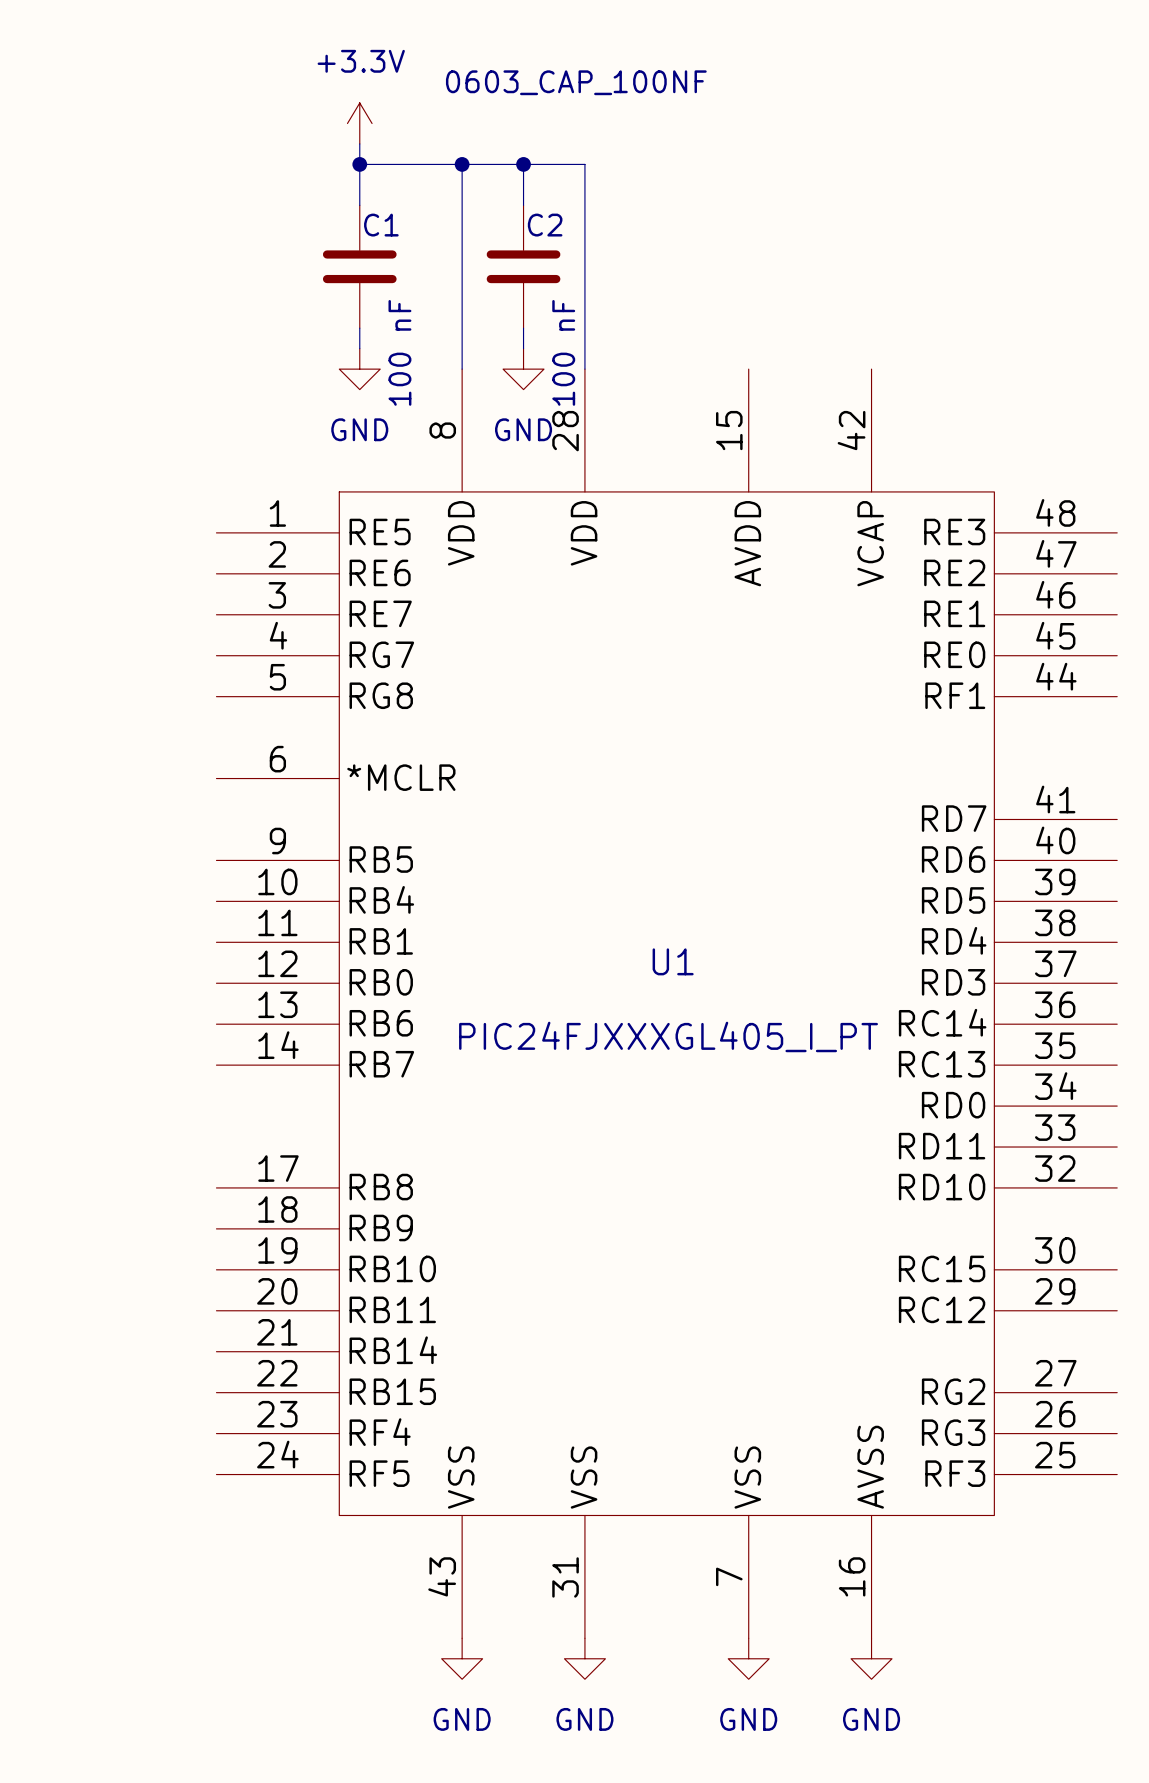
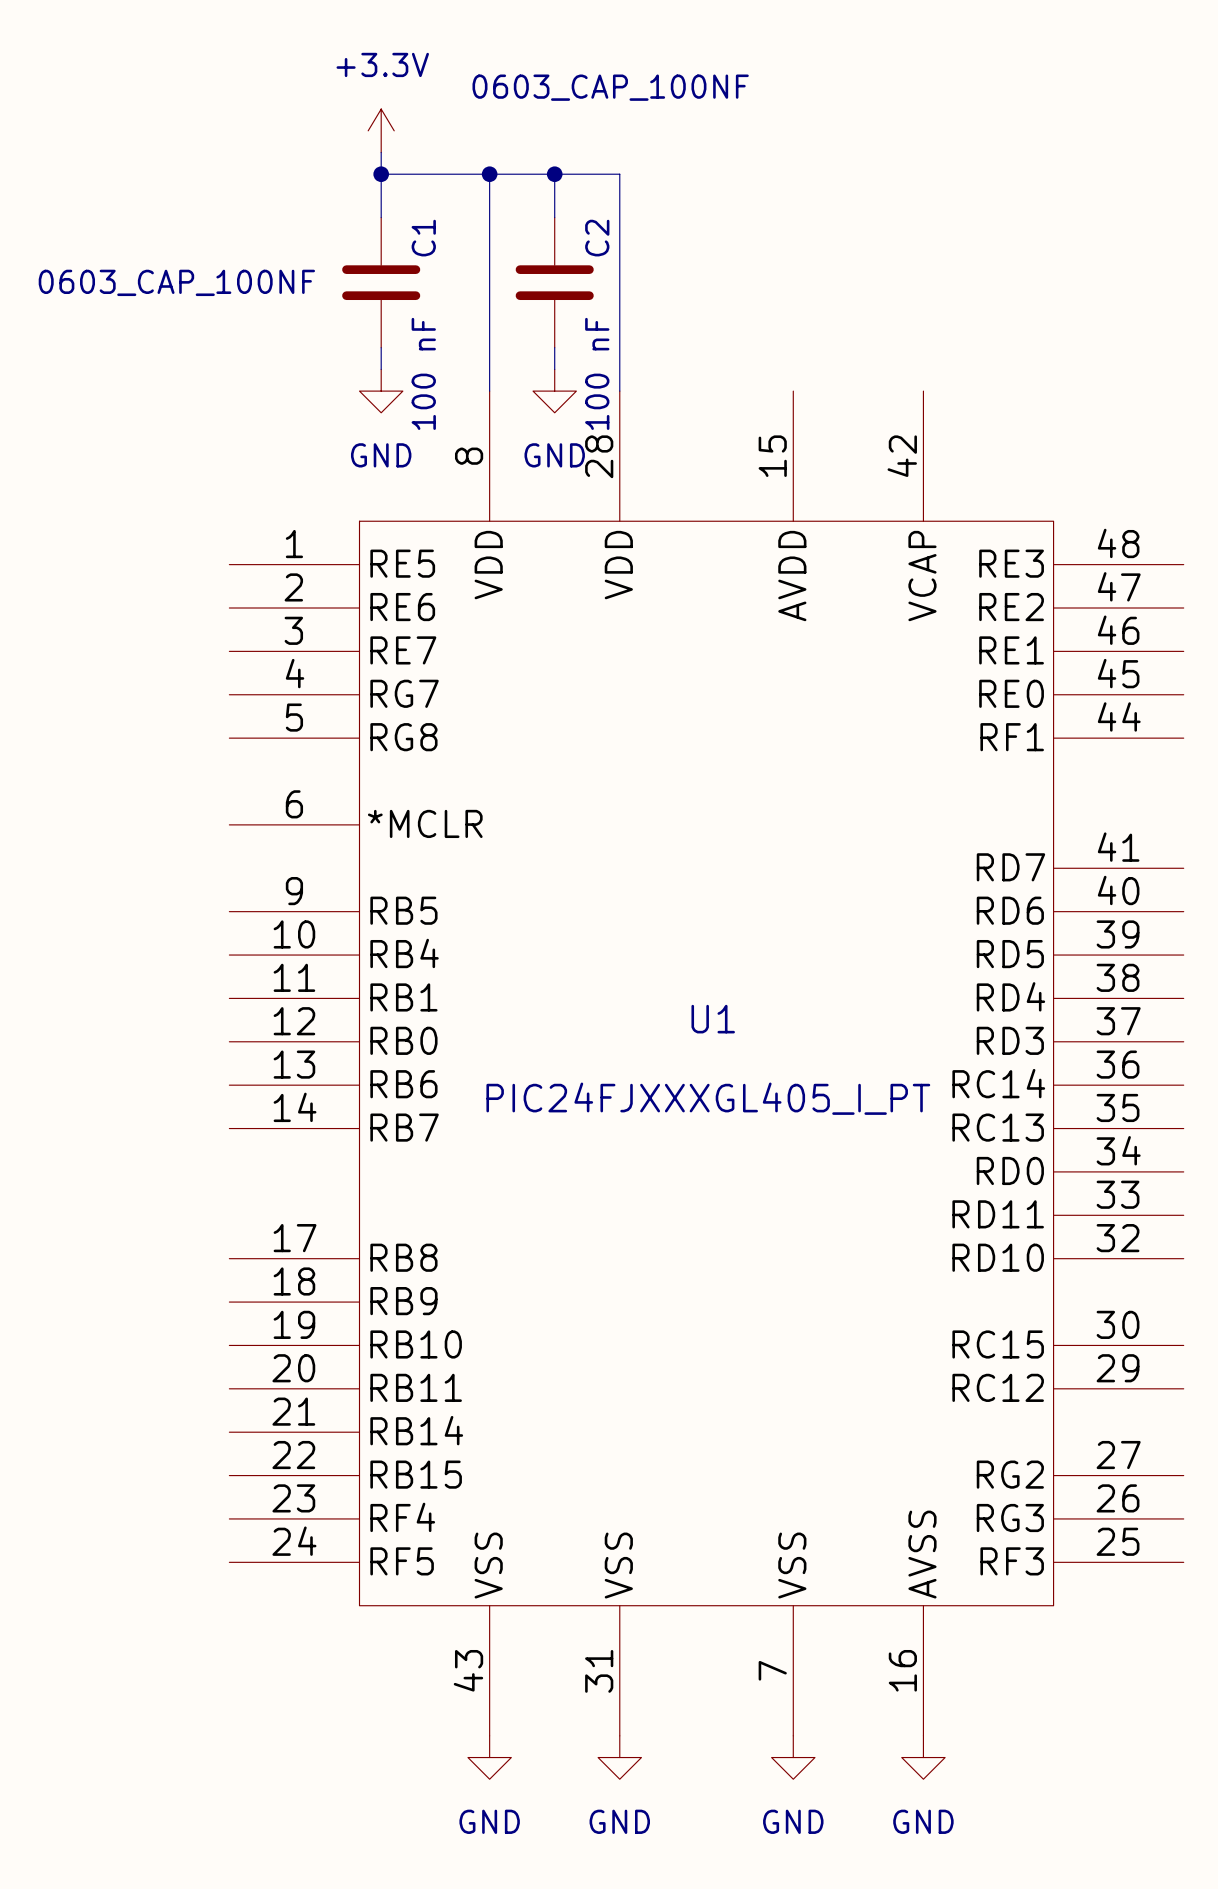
C1 name rotation: 0° (381, 225) -> 90° counterclockwise (423, 238)
C2 name rotation: 0° (545, 225) -> 90° counterclockwise (597, 238)
C1 text: none -> 0603_CAP_100NF (176, 282)

